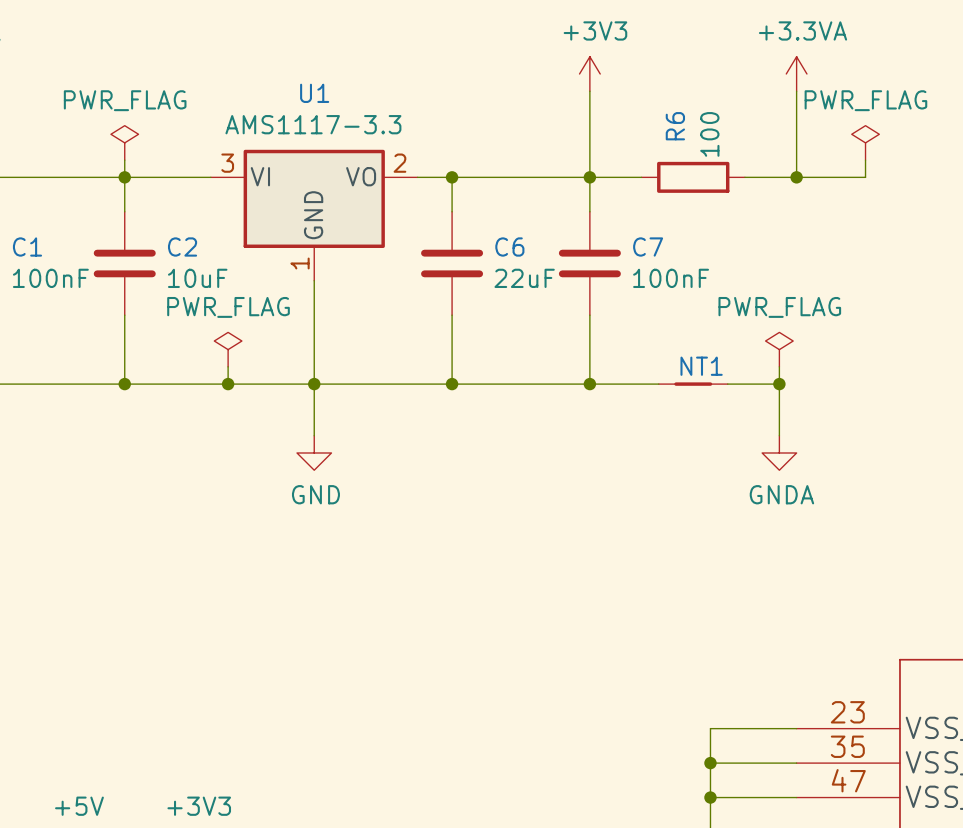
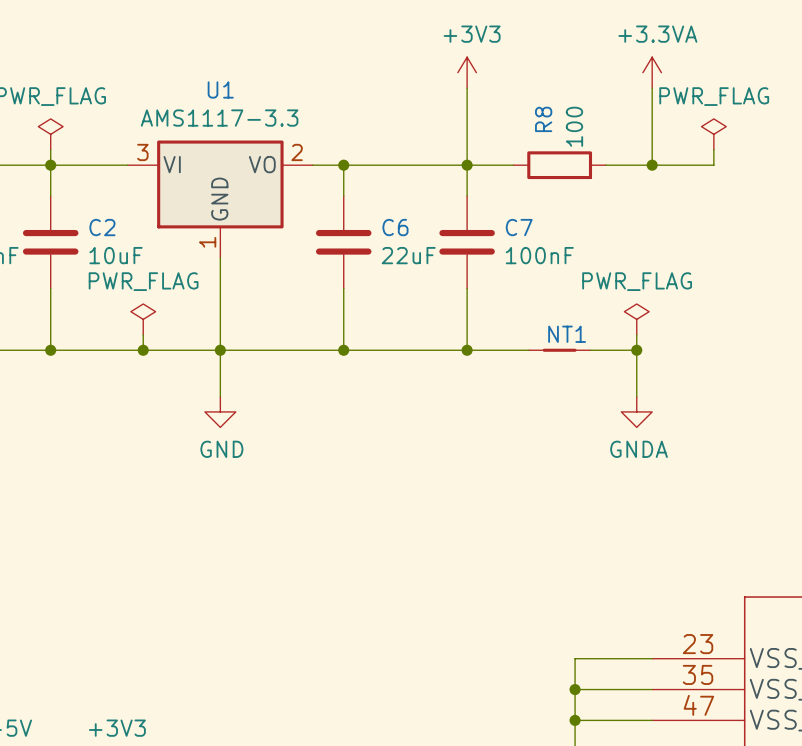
R6 name: R6 (675, 126) -> R8 (543, 119)

